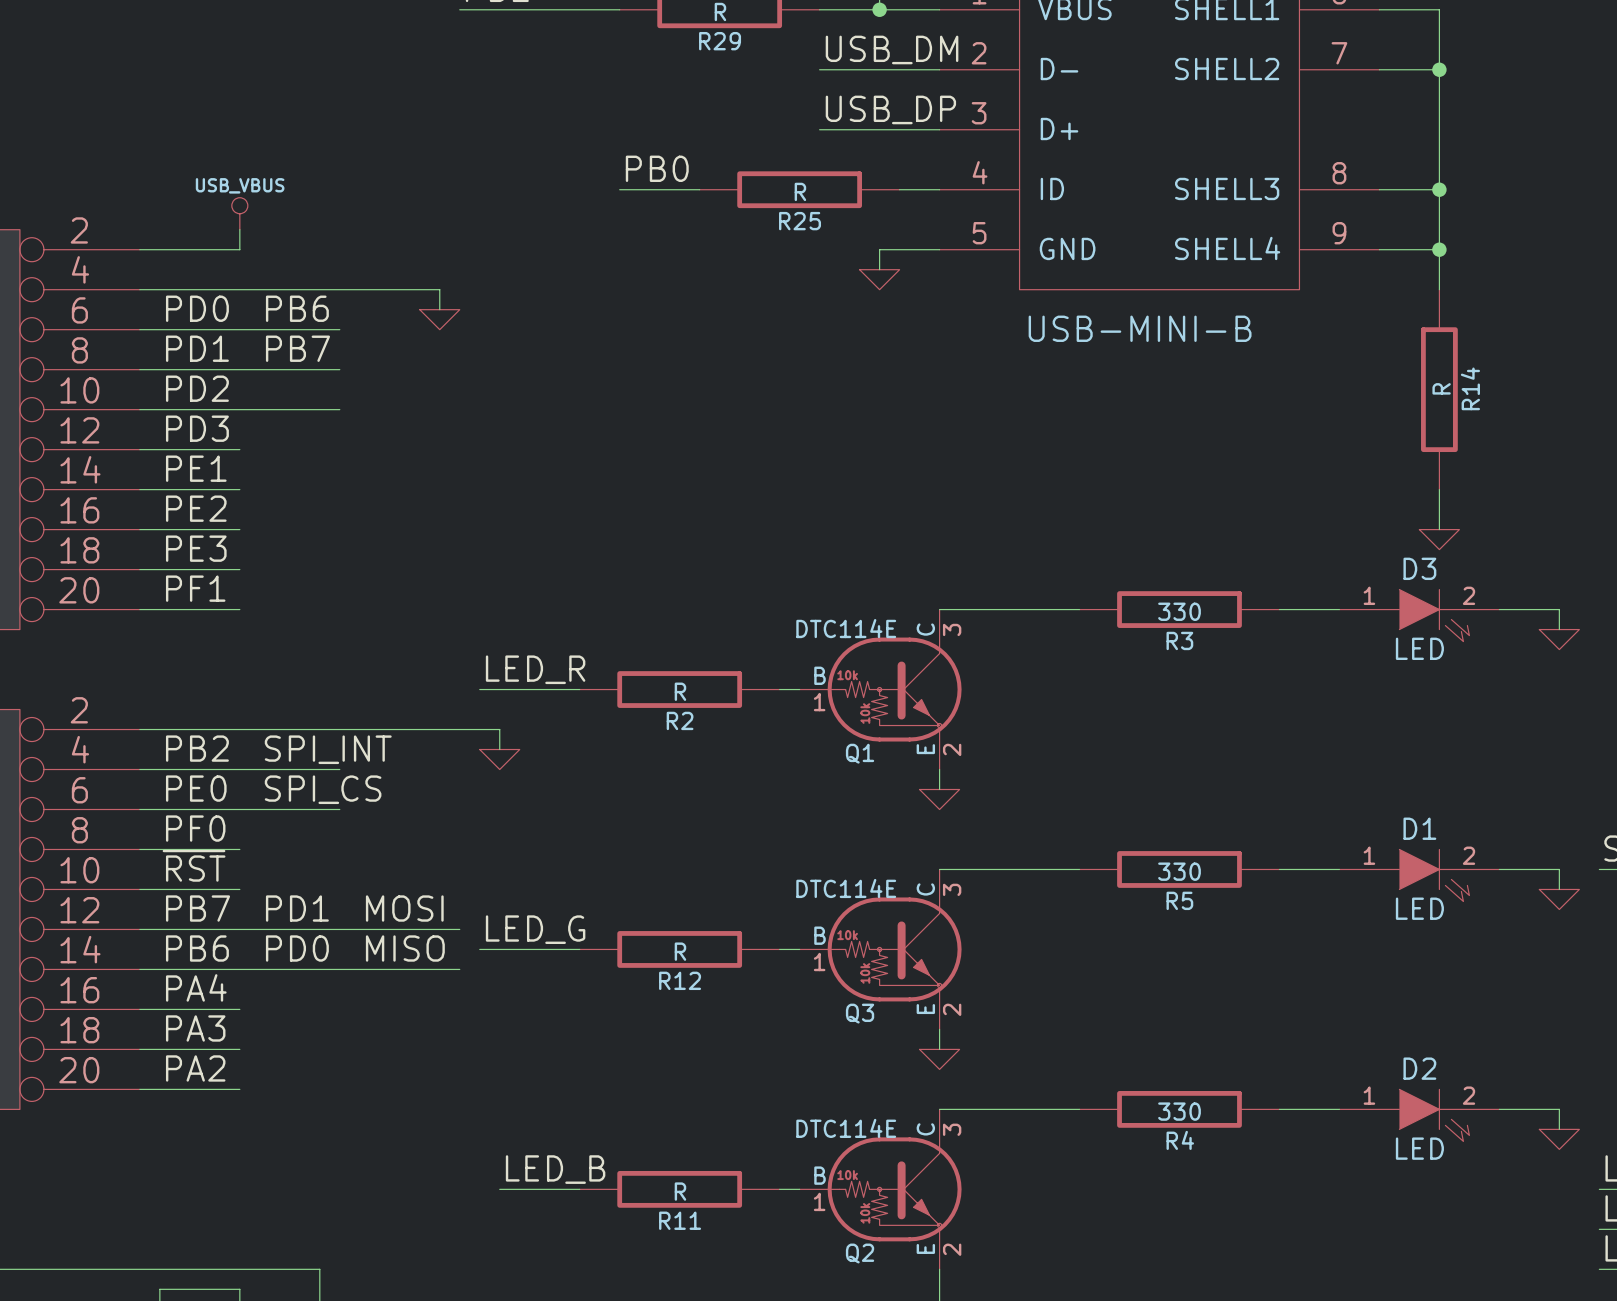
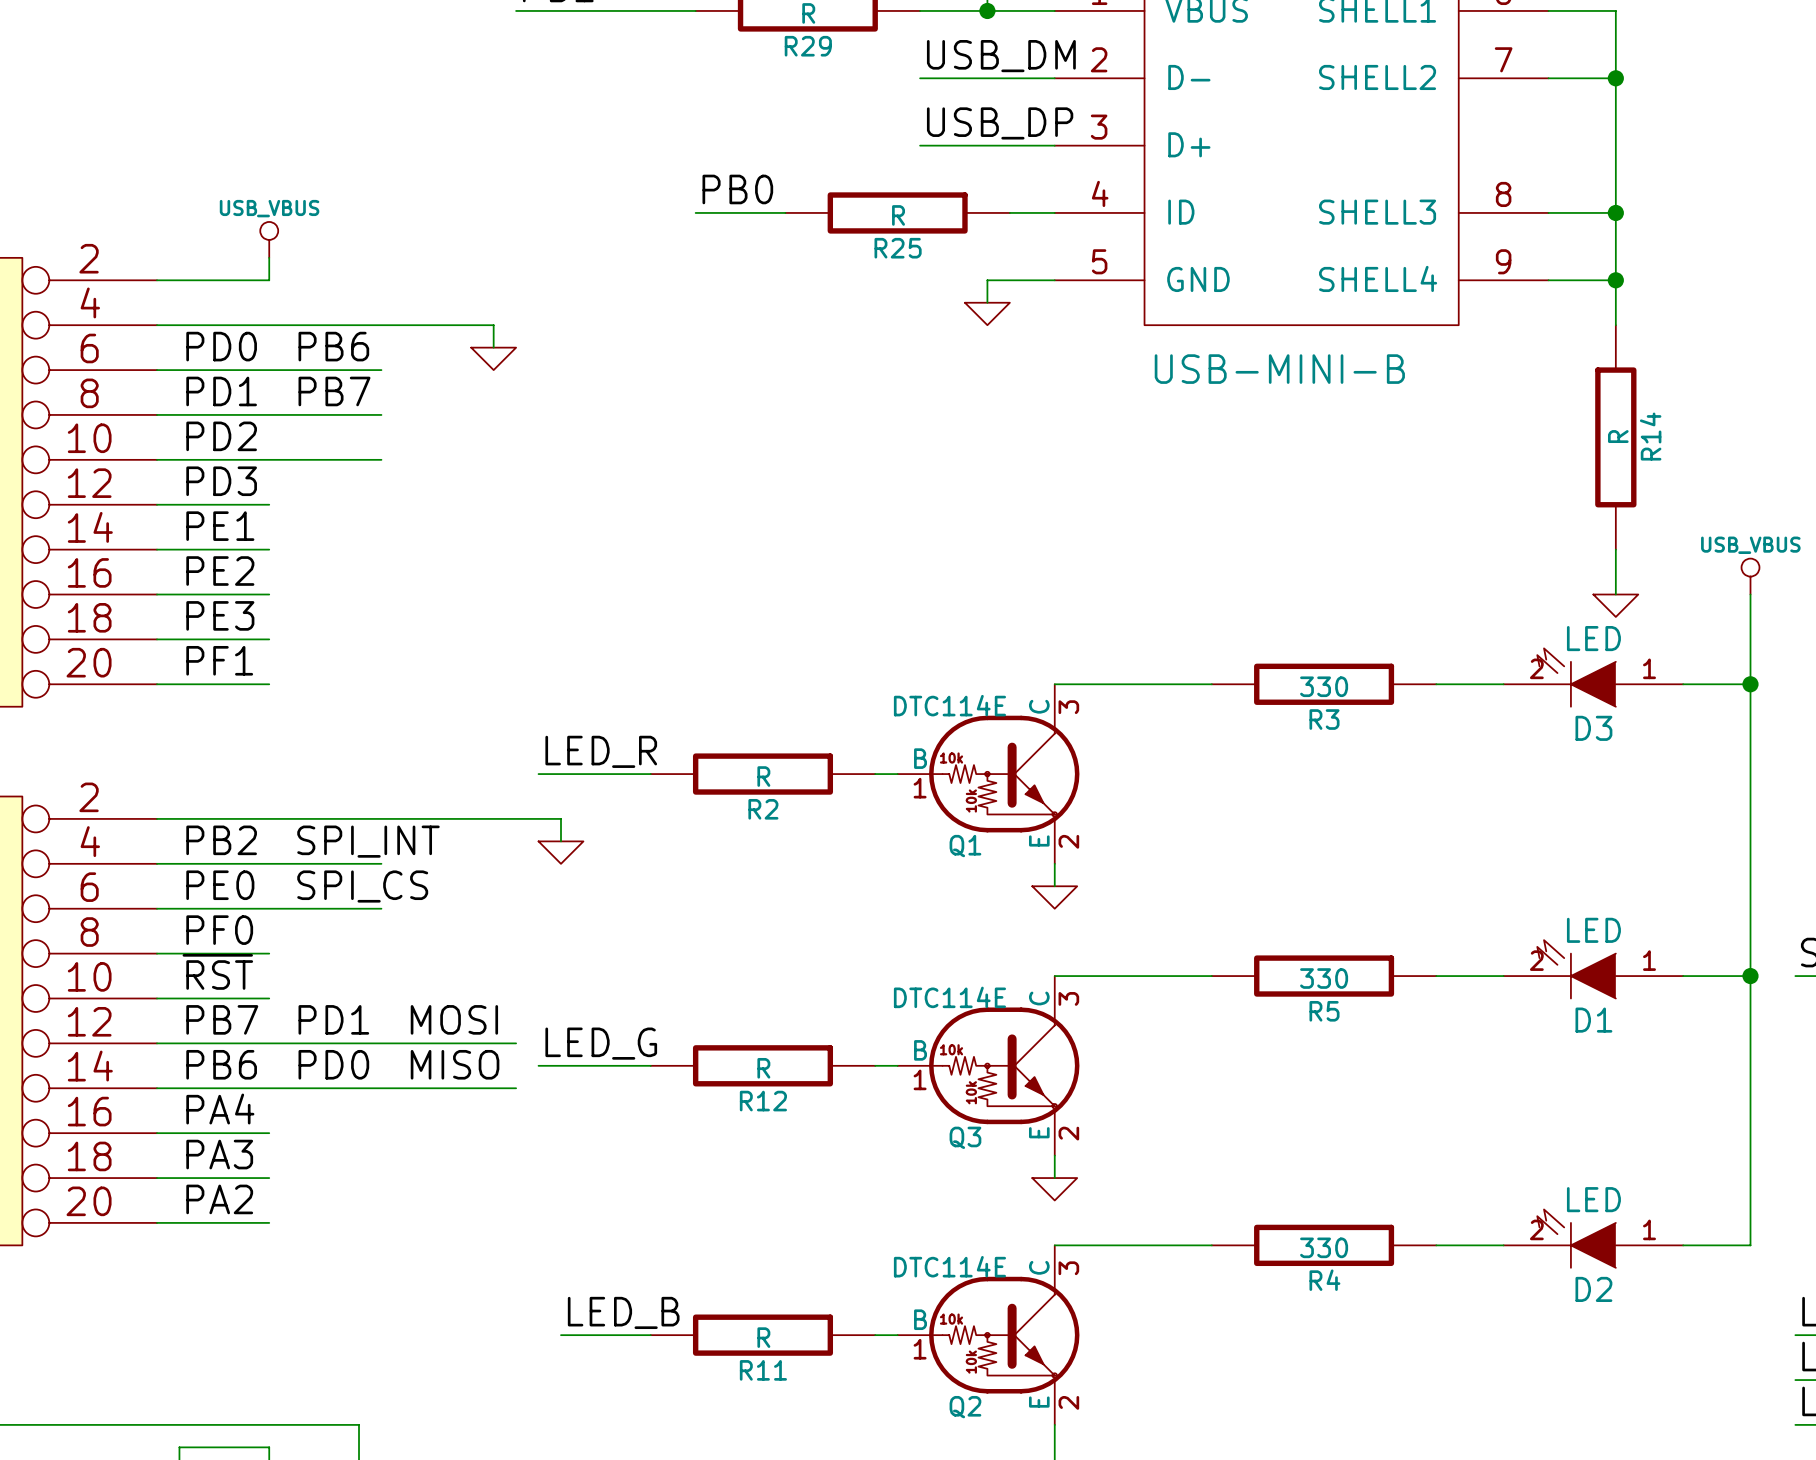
power symbol: none -> USB_VBUS (1750, 576)
wire: none -> (1750, 594) (1750, 684)
junction: none -> (1750, 684)
D3 rotation: 0° (1434, 615) -> 180° (1576, 677)
wire: none -> (1750, 706) (1750, 976)
power symbol: (1559, 639) -> none
junction: none -> (1750, 976)
D1 rotation: 0° (1434, 875) -> 180° (1576, 969)
power symbol: (1559, 899) -> none
wire: (1559, 1109) (1559, 1129) -> (1750, 1245) (1750, 998)
D2 rotation: 0° (1434, 1115) -> 180° (1576, 1238)
power symbol: (1559, 1139) -> none

